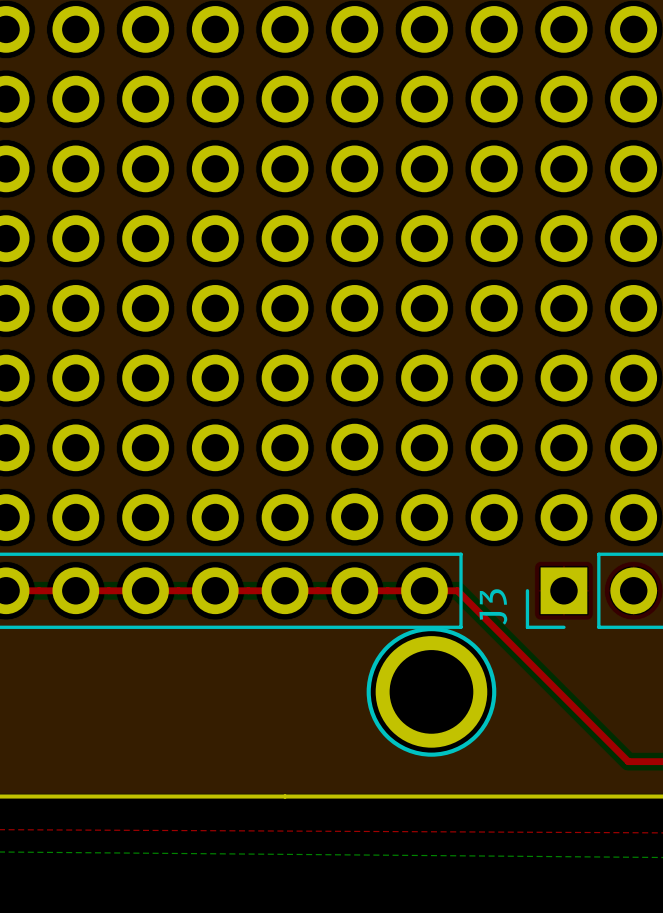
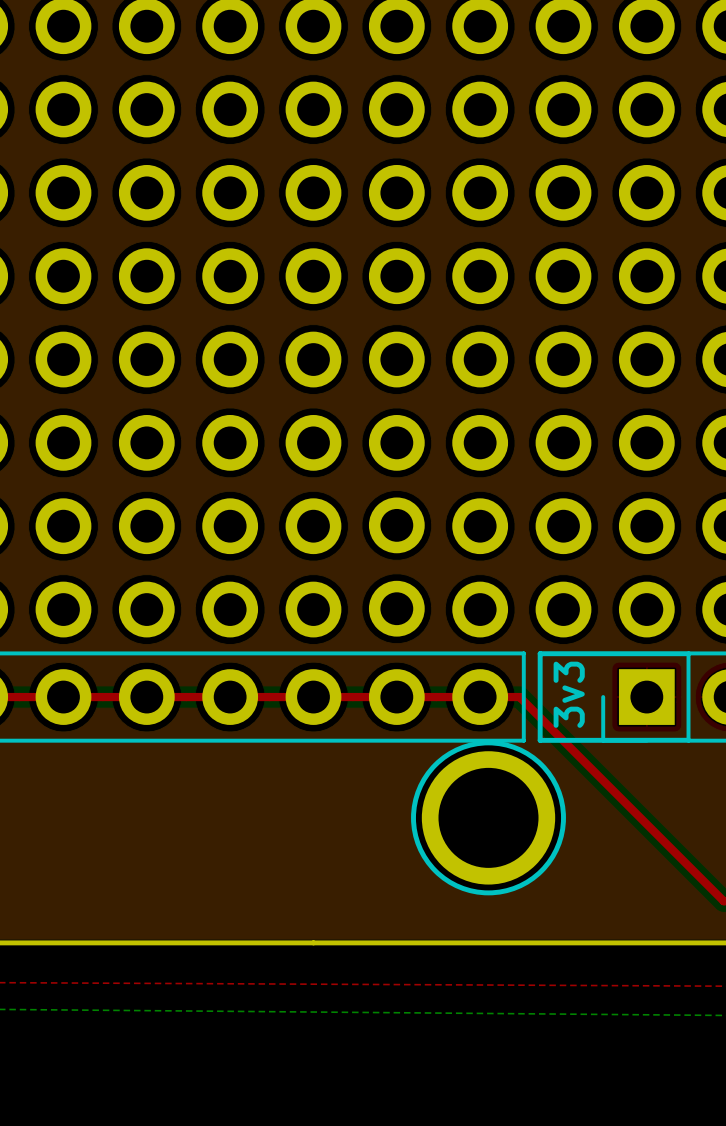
line: none -> (688, 653) (540, 653) (540, 740) (688, 740)
text: none -> 3v3 (569, 694)
J3 name: J3 (493, 606) -> none

